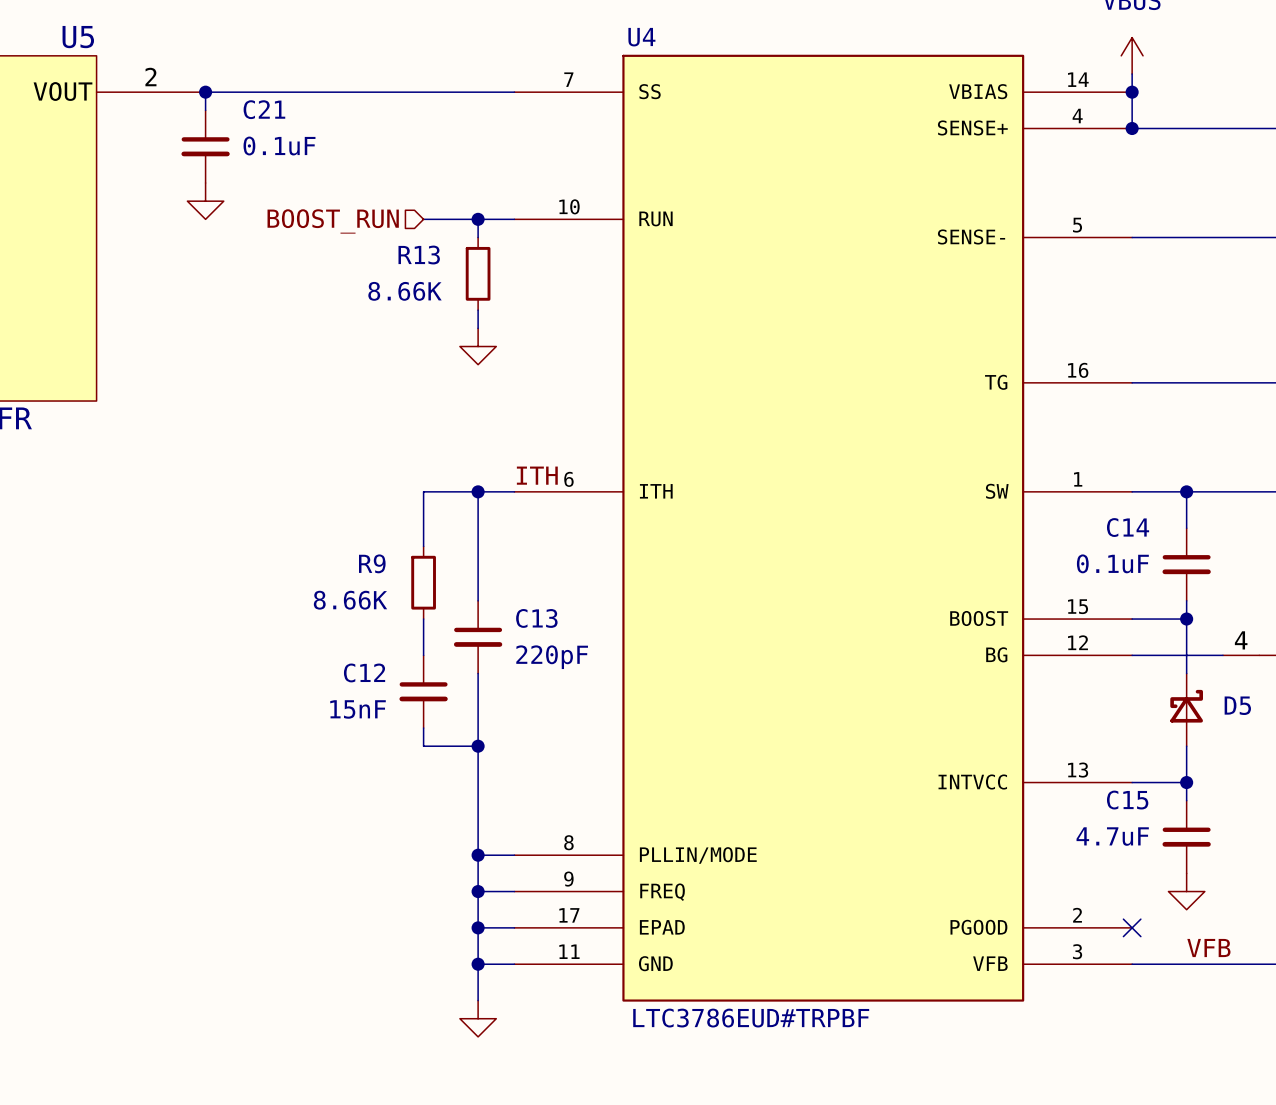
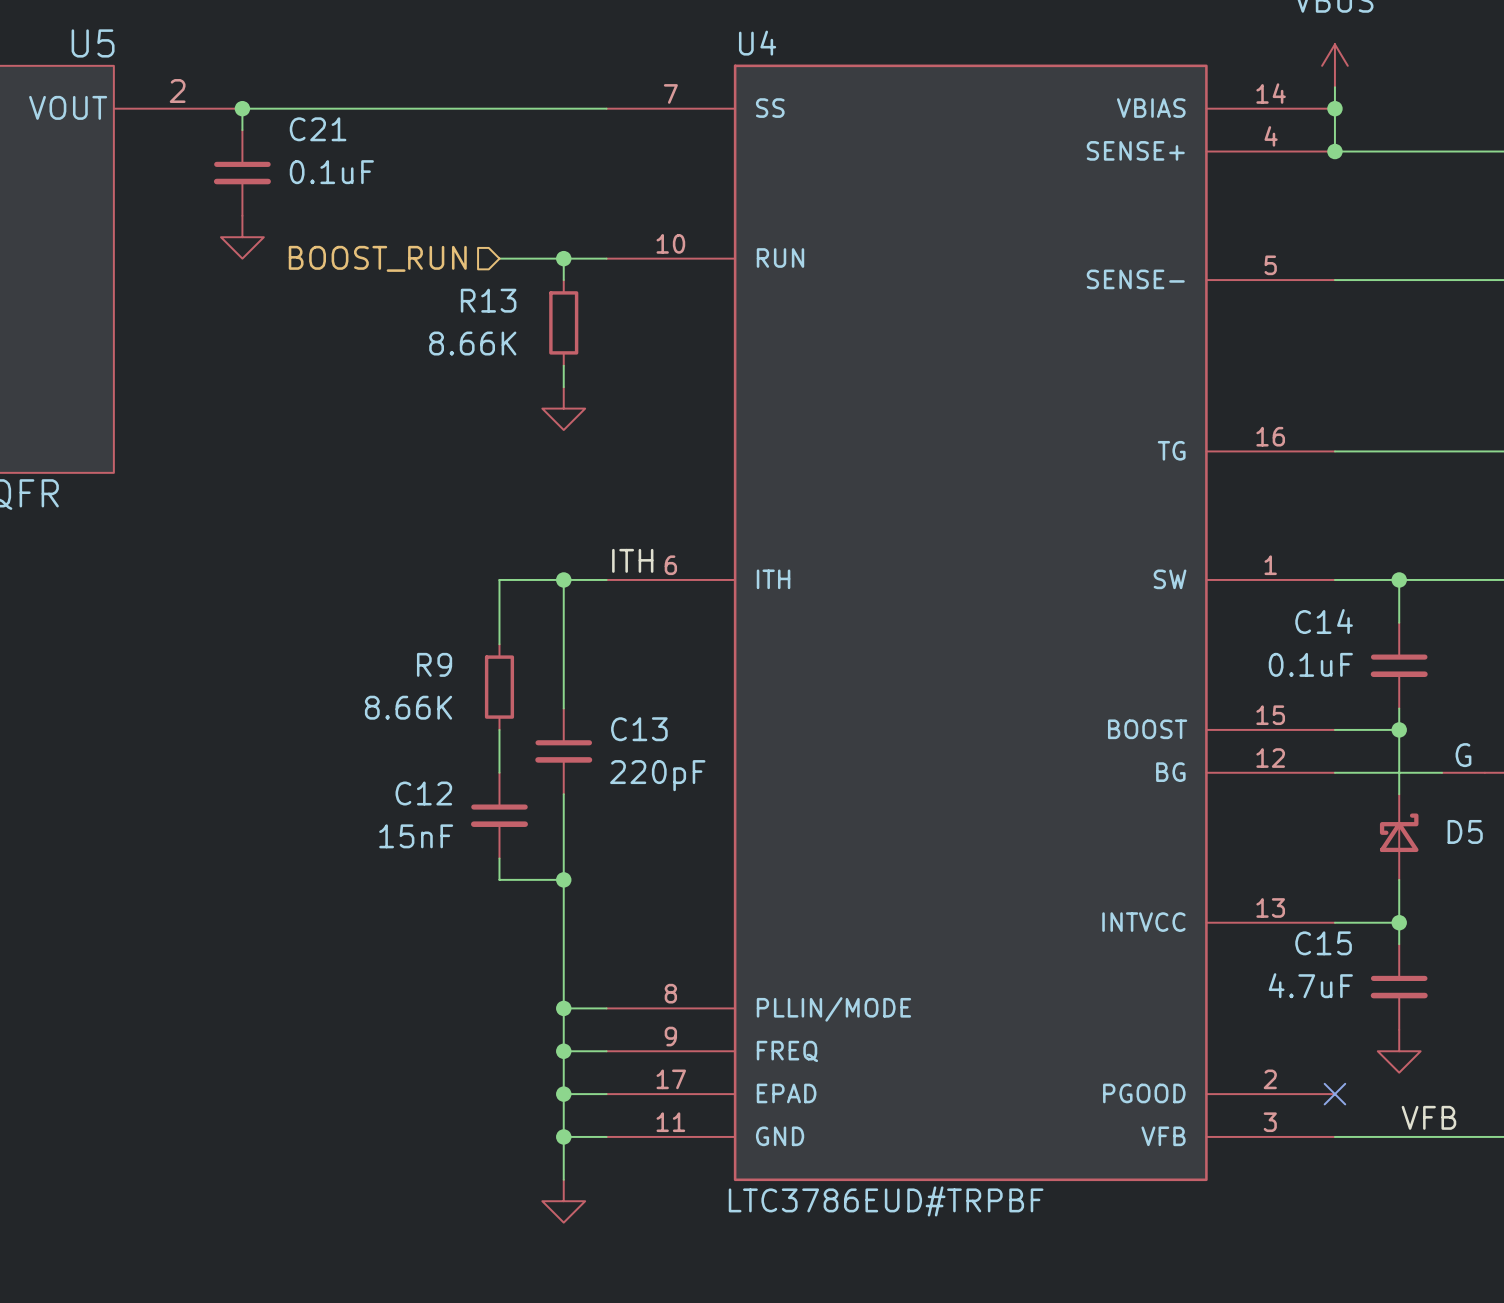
part pin name: none -> G (1463, 755)
part pin number: 4 (1241, 640) -> none

